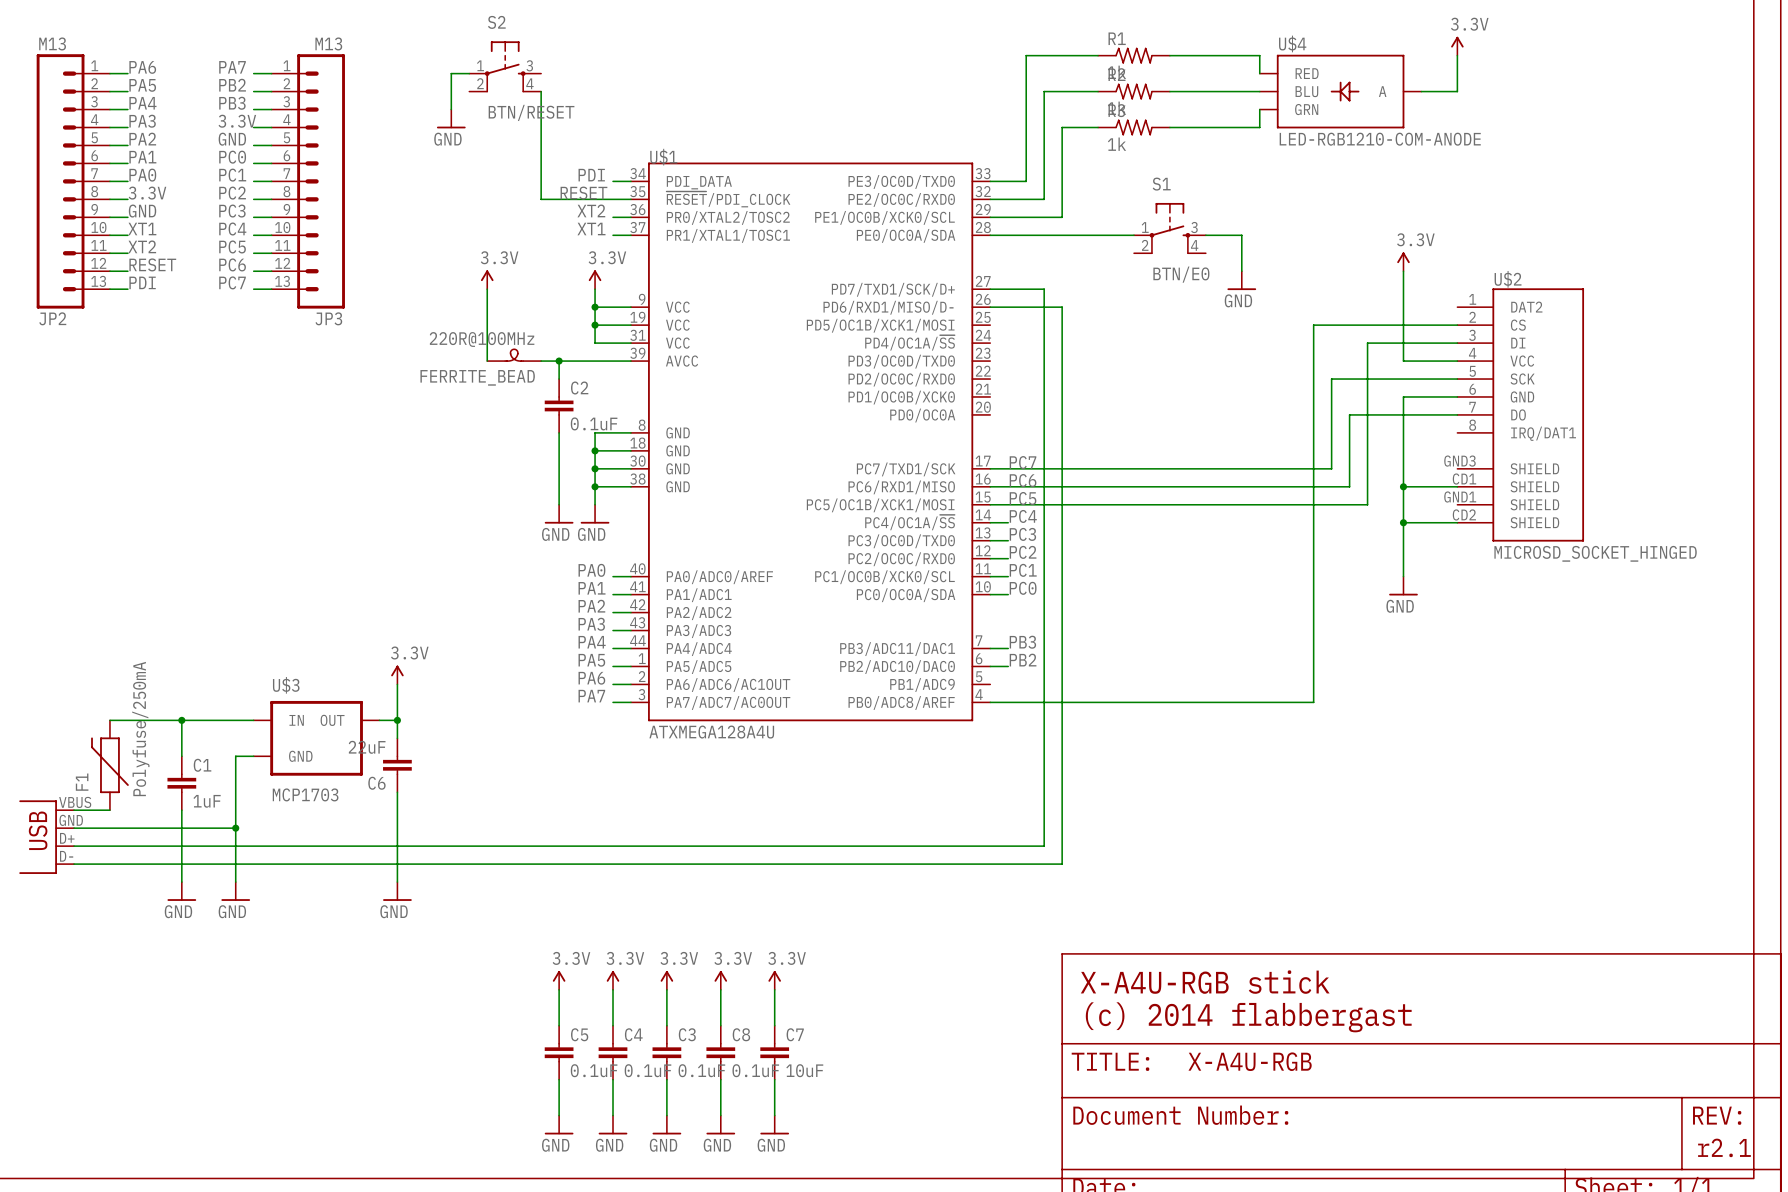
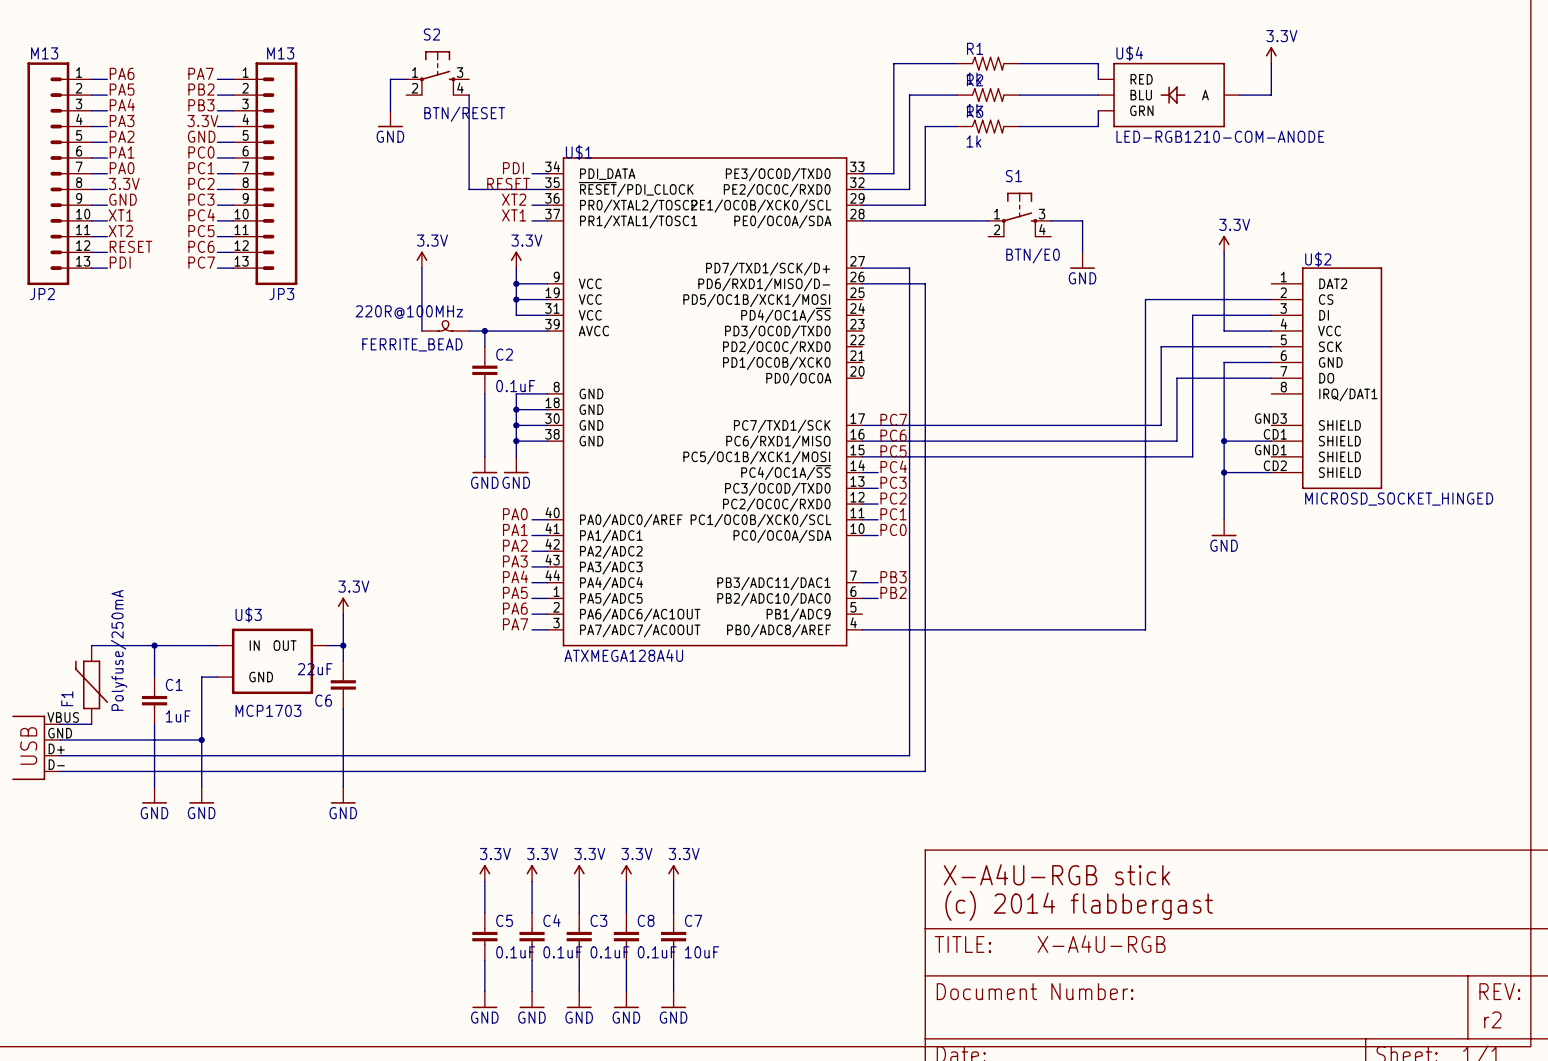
text: r2.1 (1724, 1147) -> r2 (1492, 1019)

